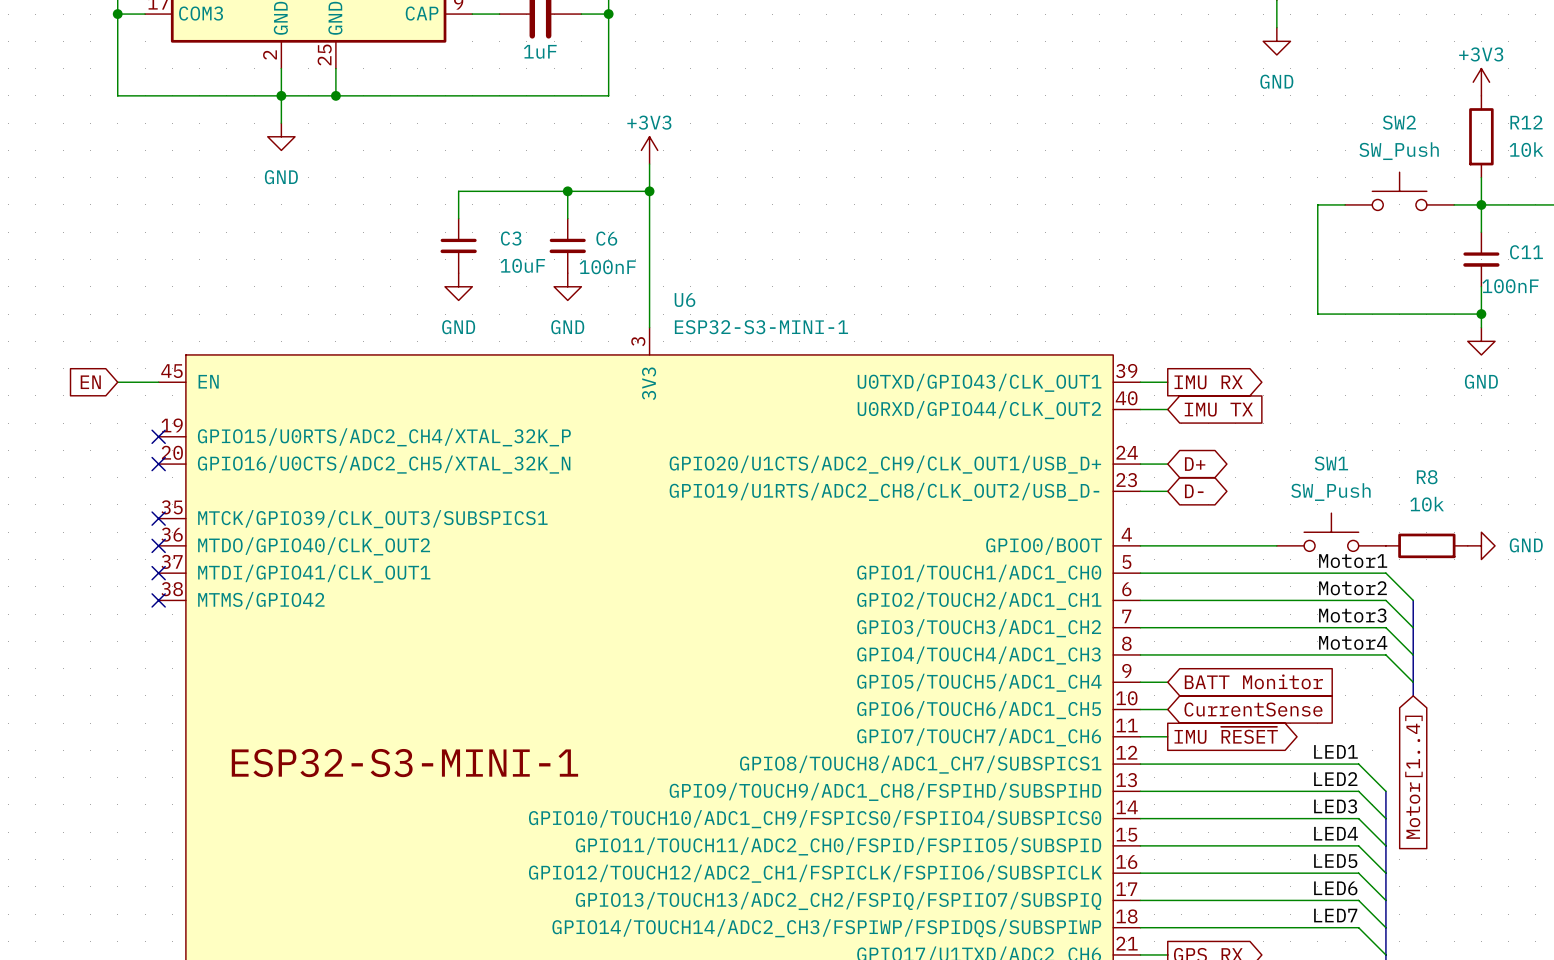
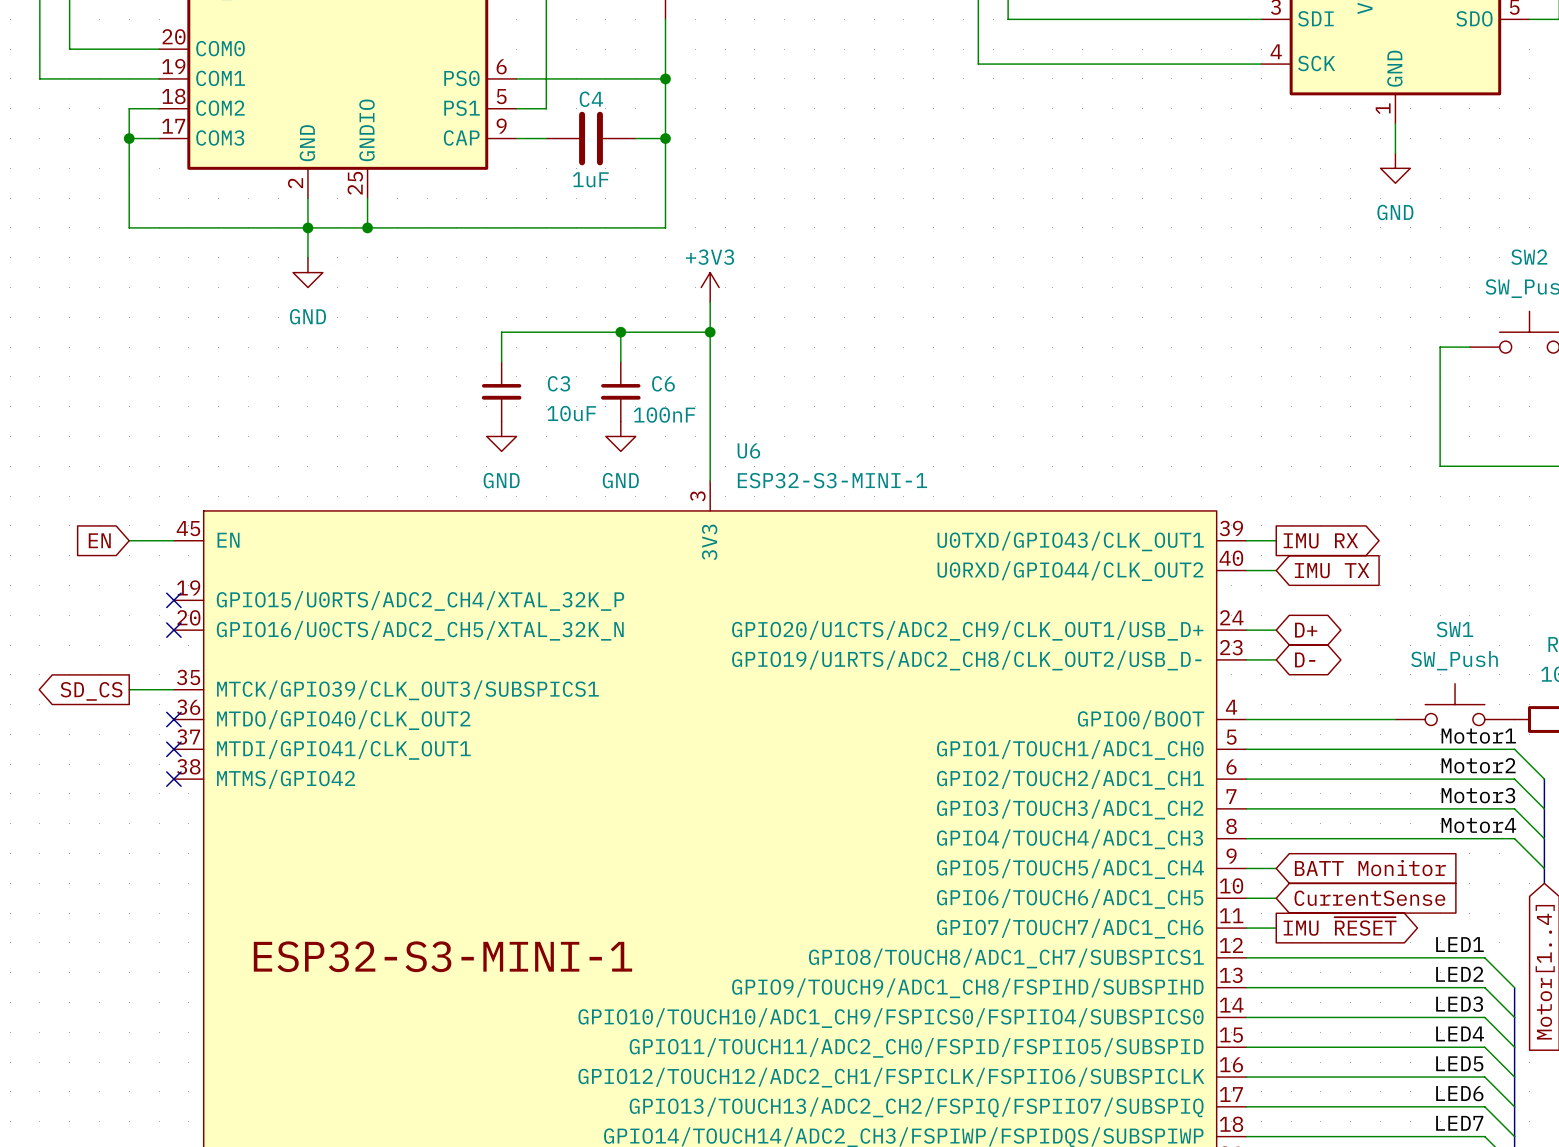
wire: none -> (129, 689) (173, 689)
no-connect mark: (158, 518) -> none
global label: none -> SD_CS (91, 691)

